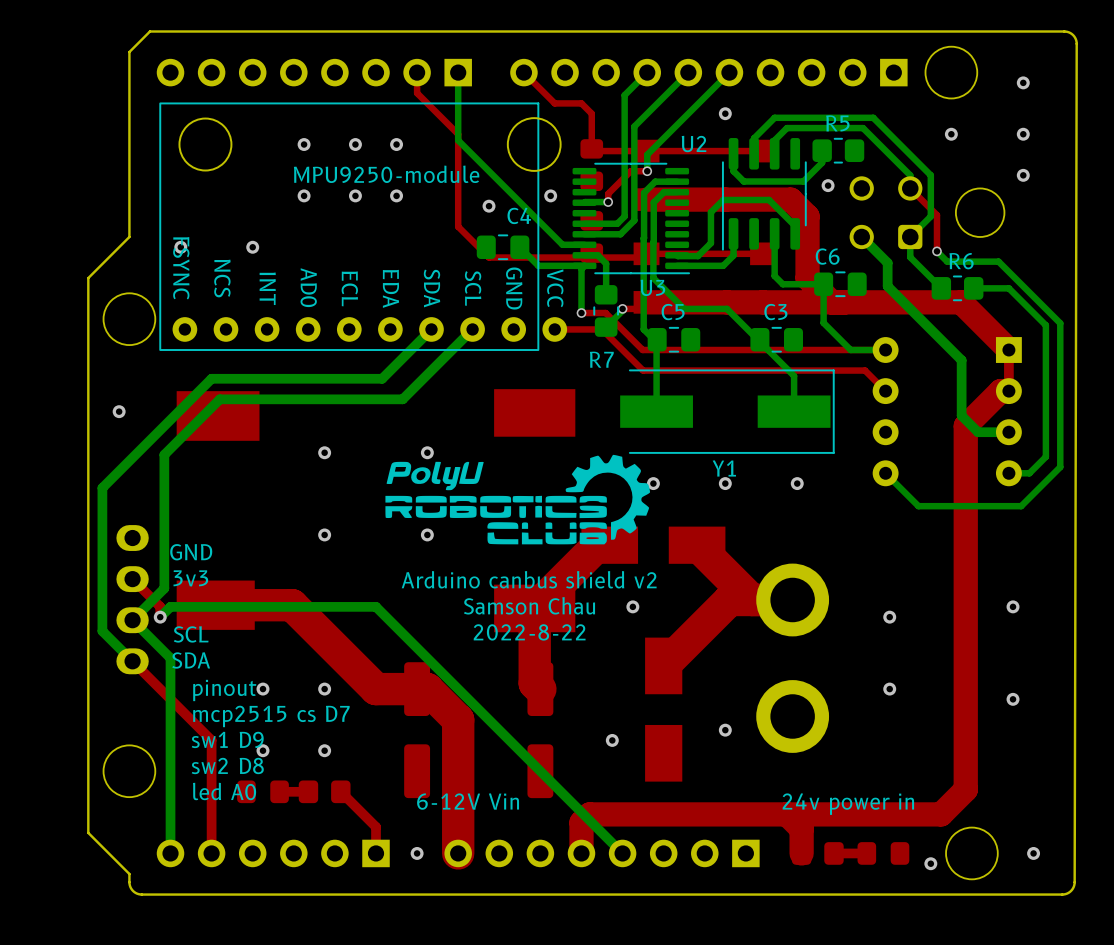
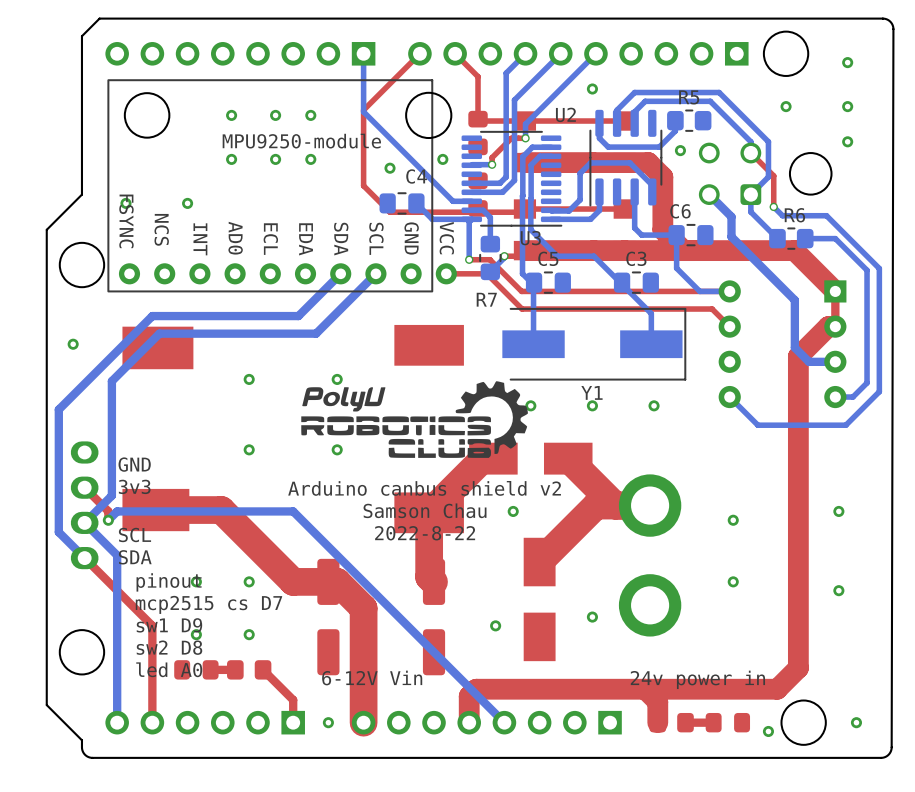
top track: (417, 72) (417, 93) (458, 134) (458, 138) -> (419, 53) (363, 110)
top track: (523, 72) (554, 103) (581, 103) (591, 113) -> (455, 53) (478, 76) (478, 89)

